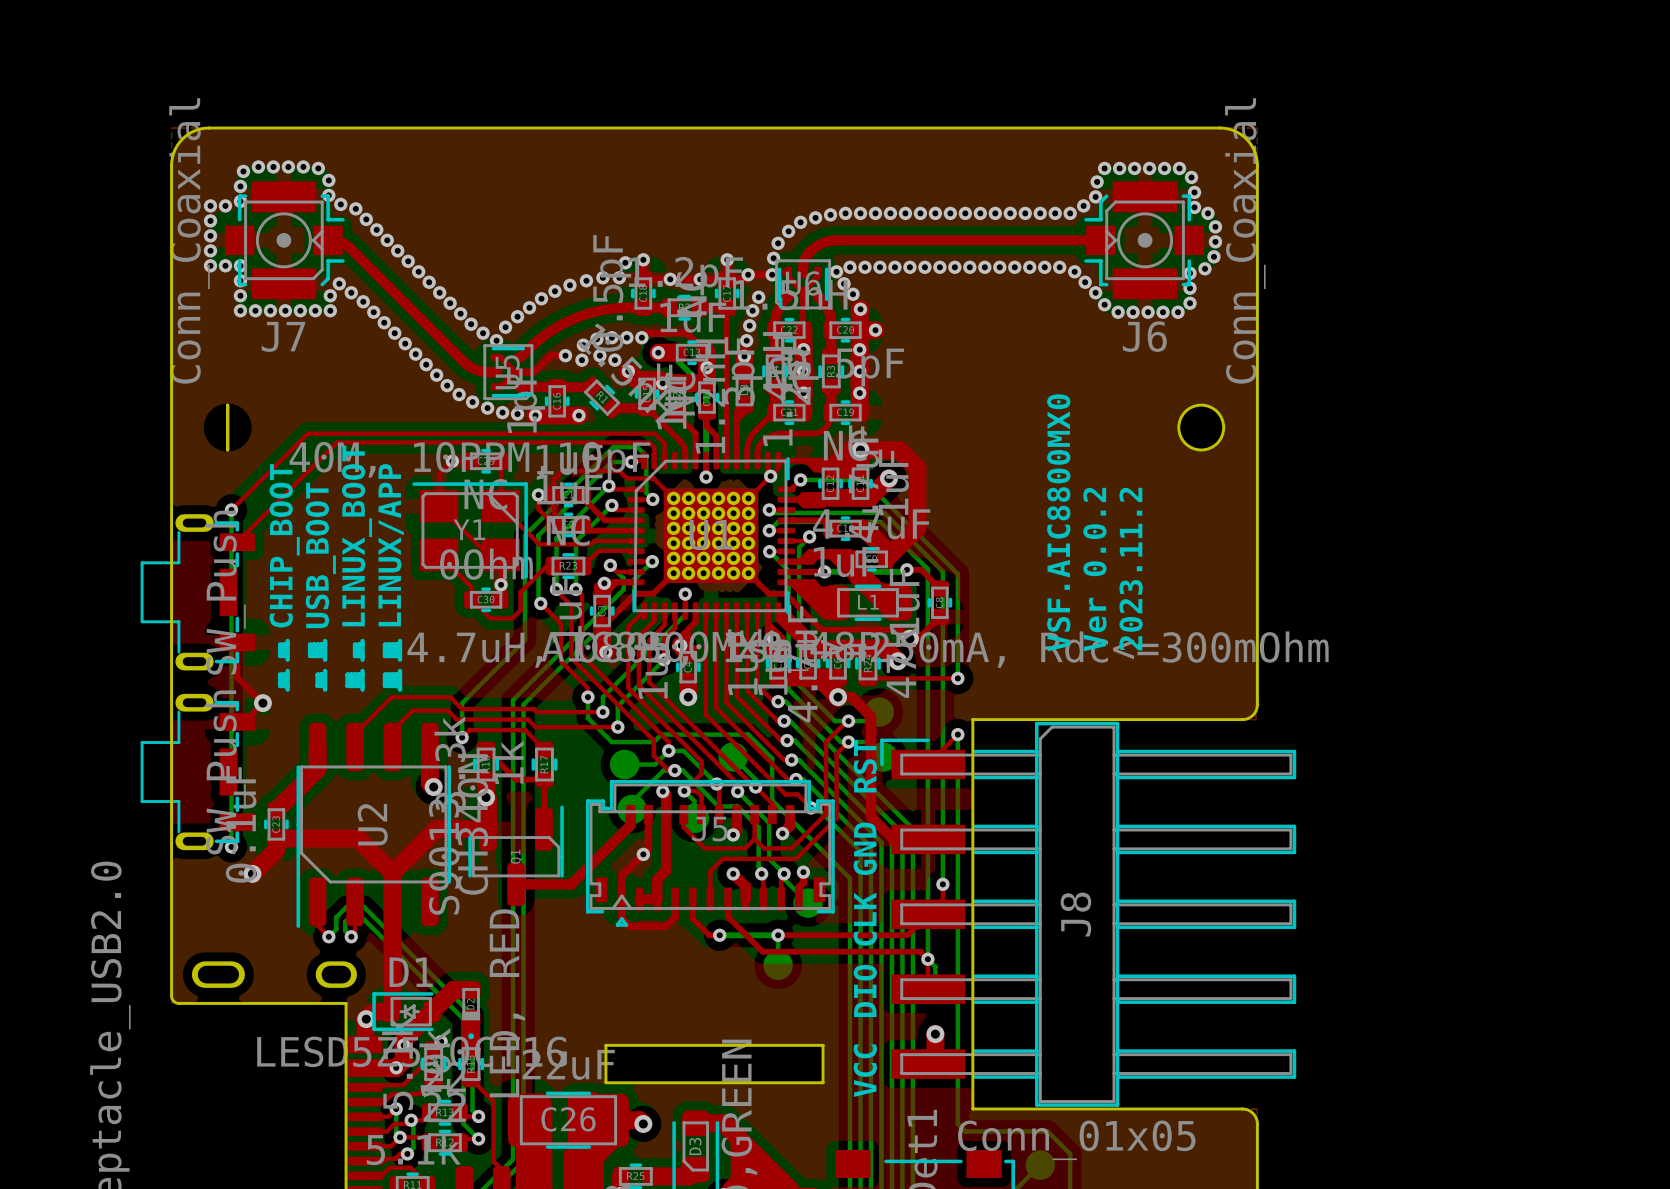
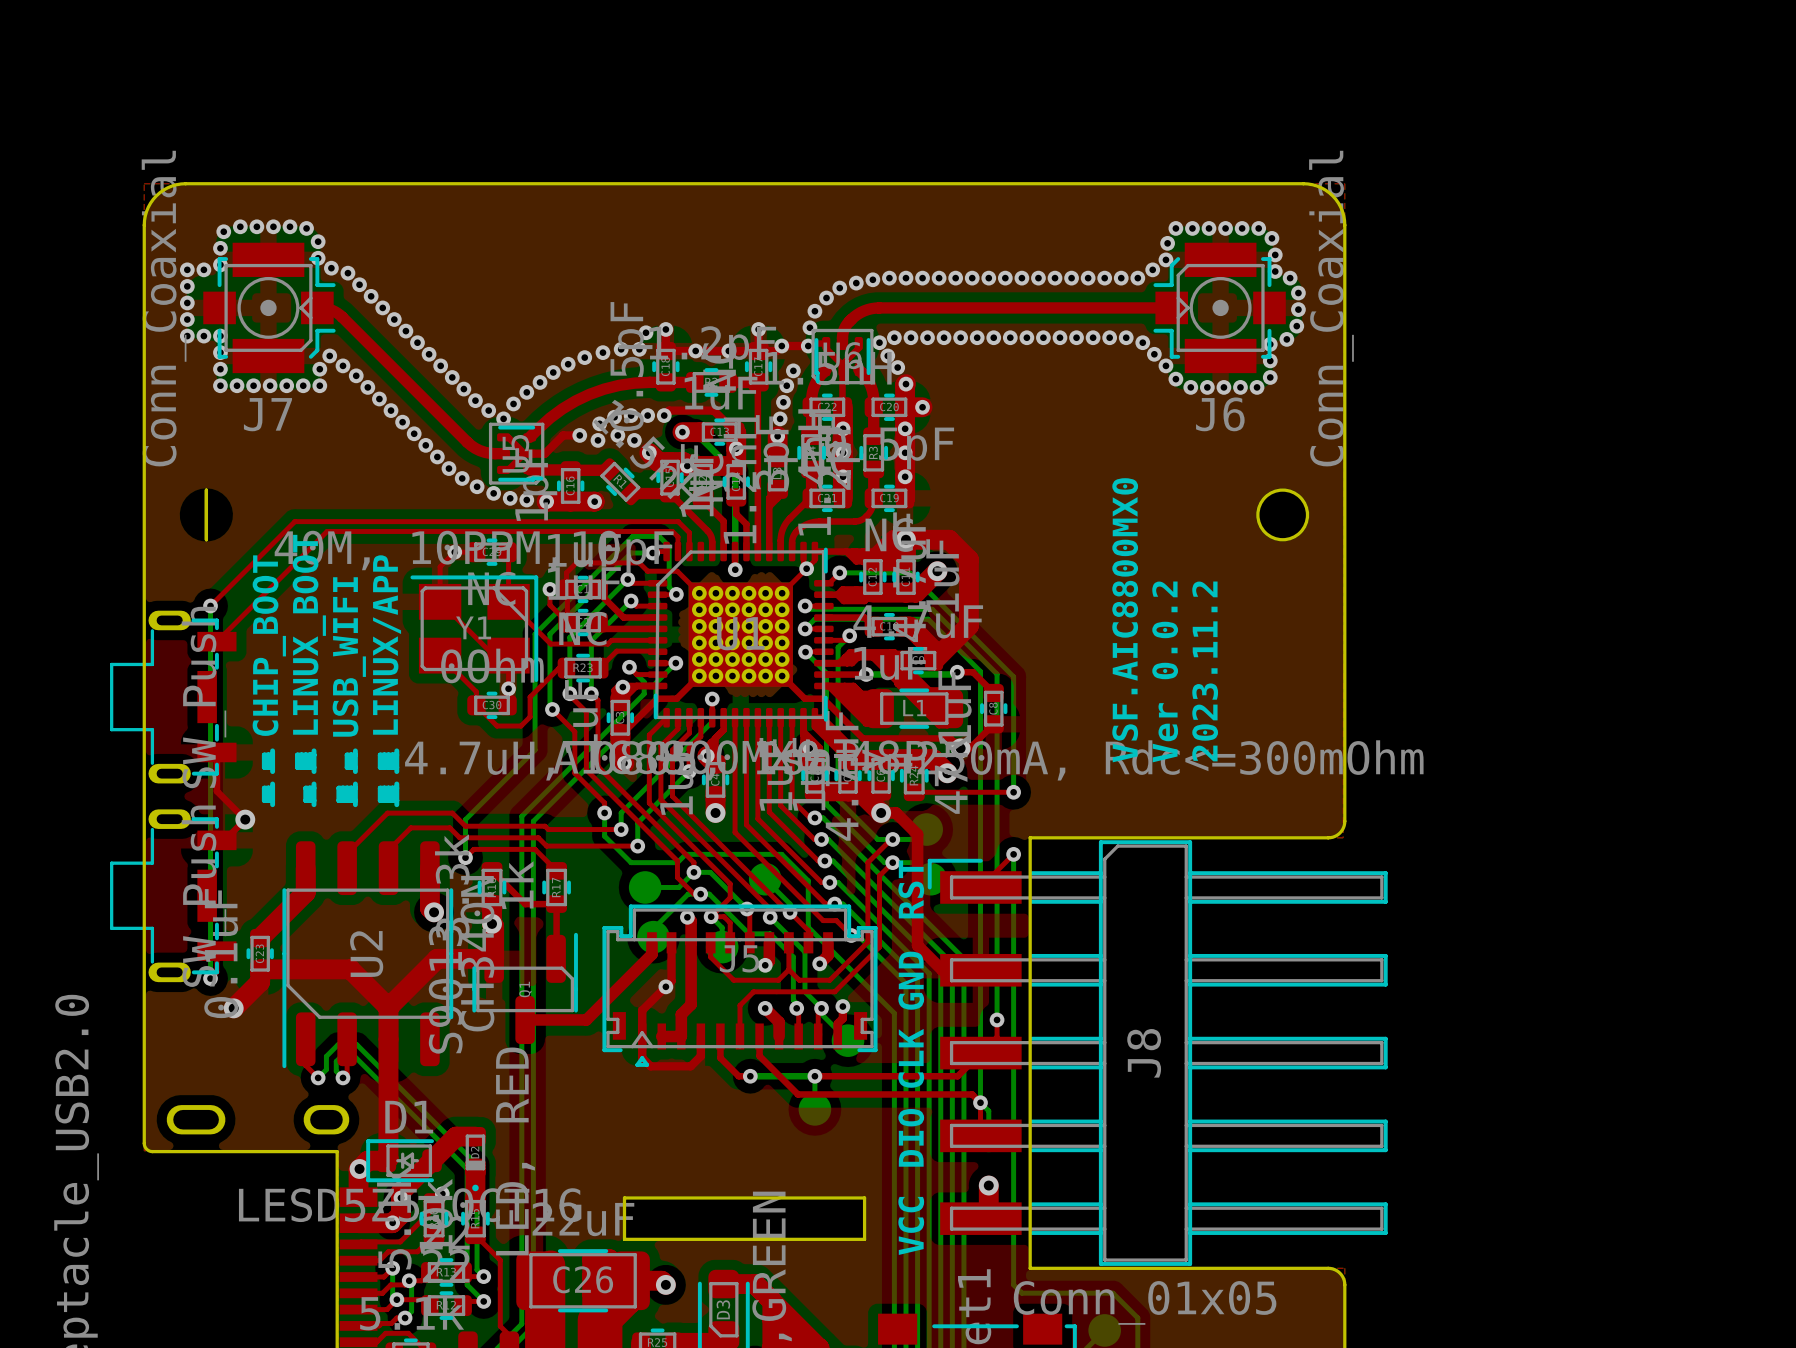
text: LINUX_BOOT (356, 535) -> USB_WIFI (349, 656)
text: USB_BOOT (320, 555) -> LINUX_BOOT (309, 634)

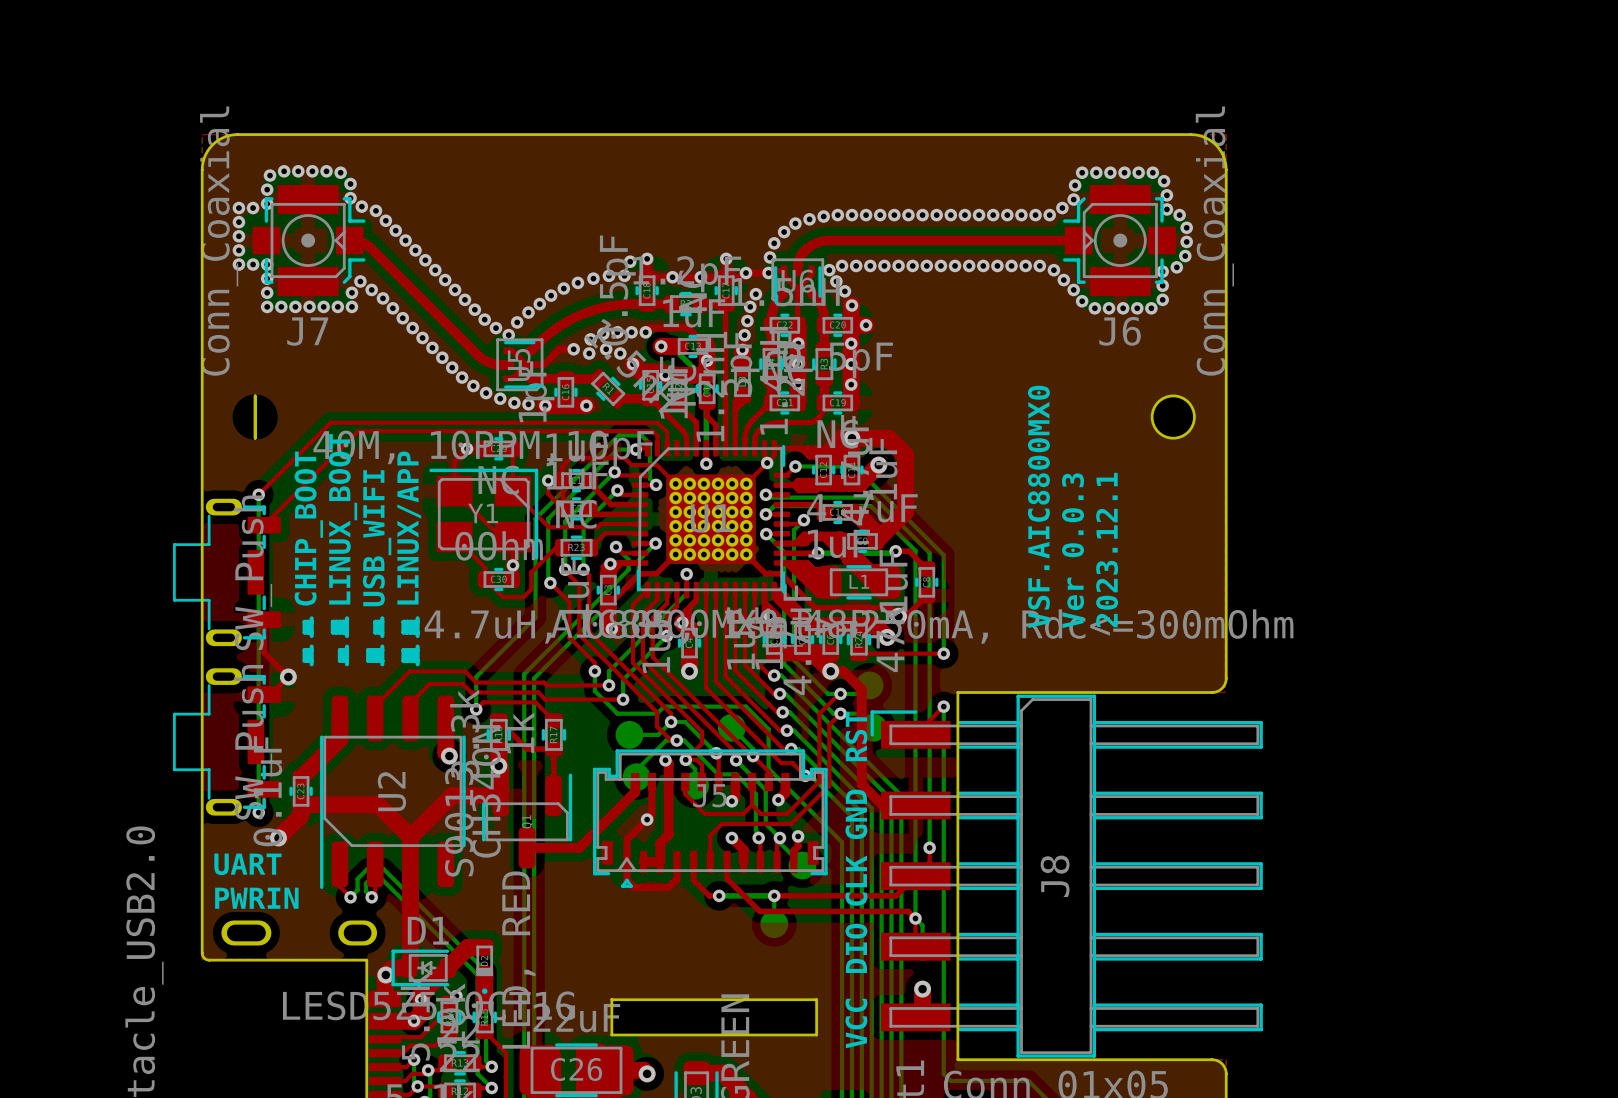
text: Ver 0.0.2 (1165, 671) -> Ver 0.0.3 (1073, 550)
text: 2023.11.2 (1205, 671) -> 2023.12.1 (1107, 550)
text: none -> UART (247, 864)
text: none -> PWRIN (256, 898)

